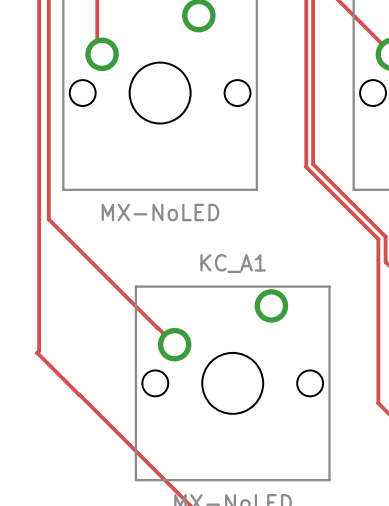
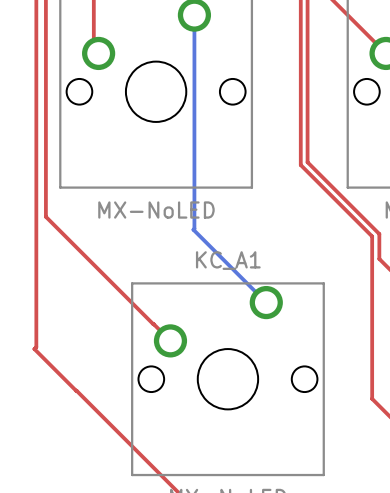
bottom track: none -> (194, 15) (193, 229) (266, 302)

